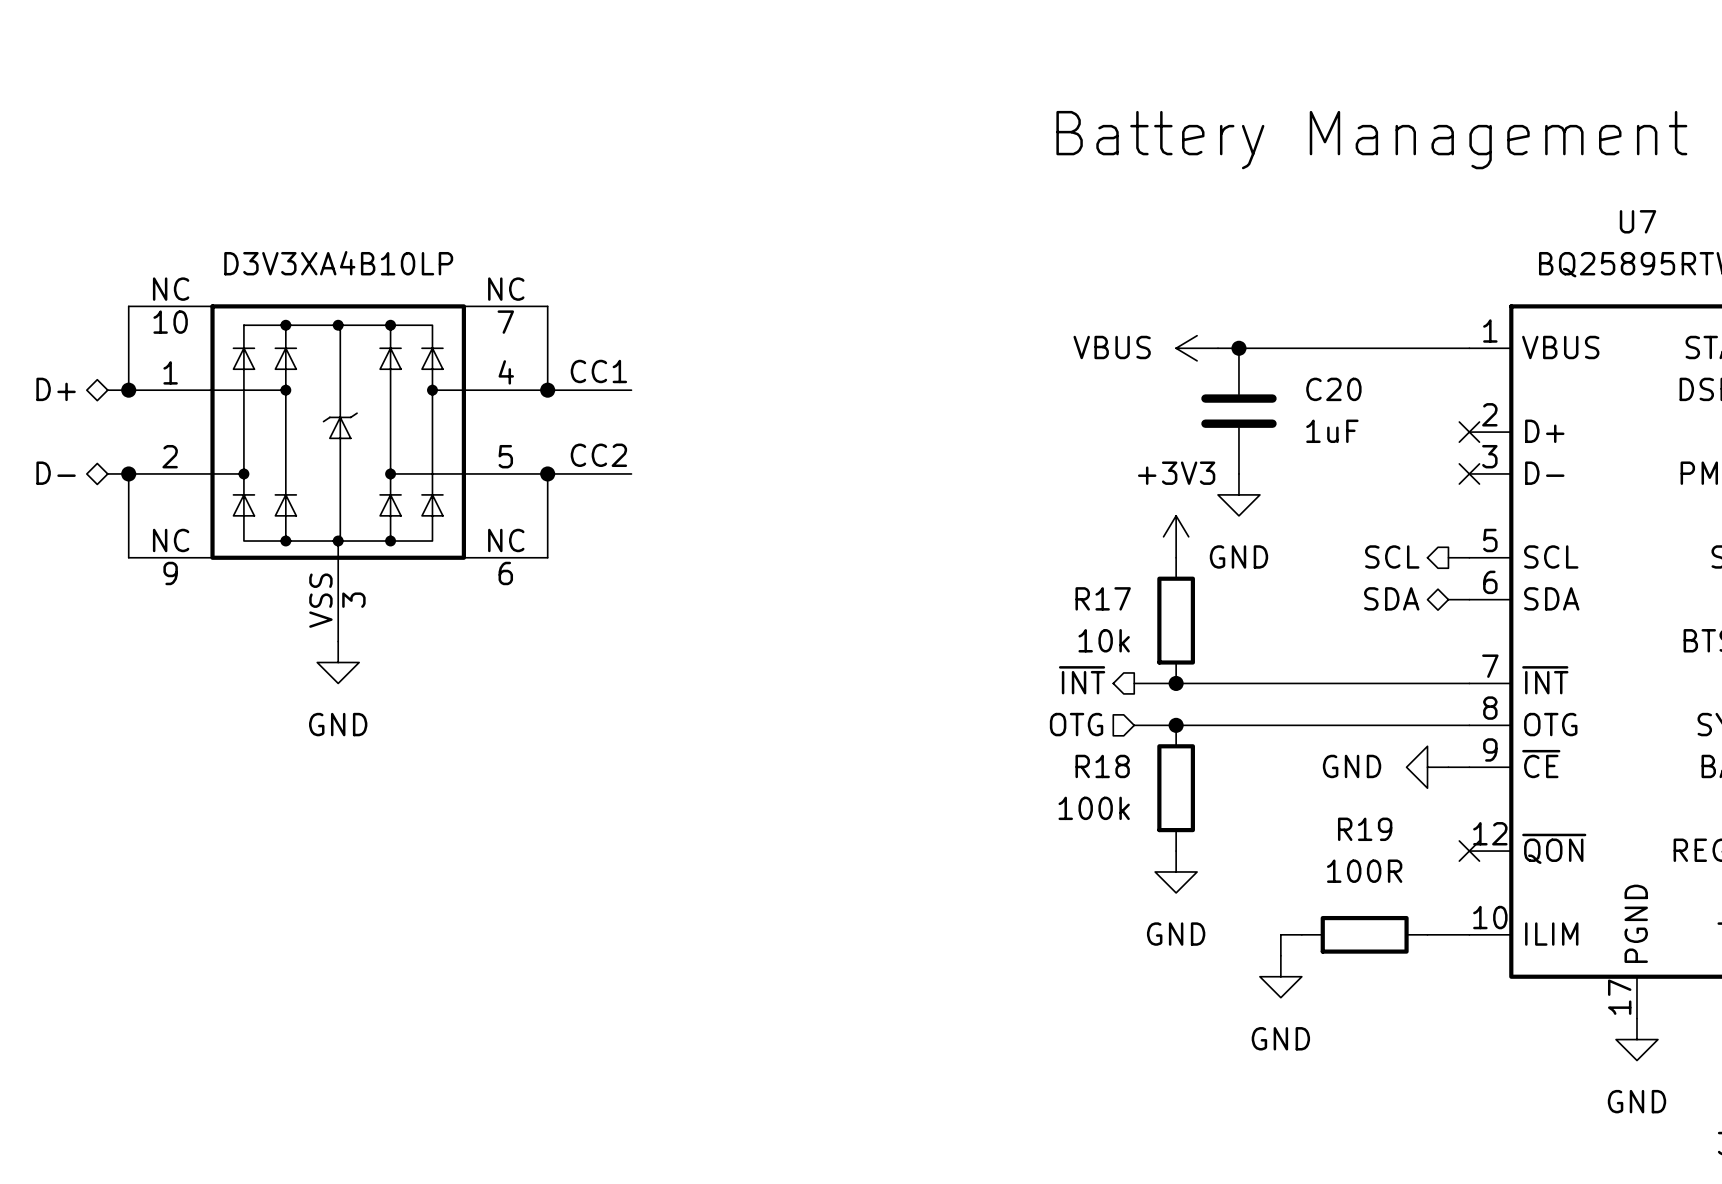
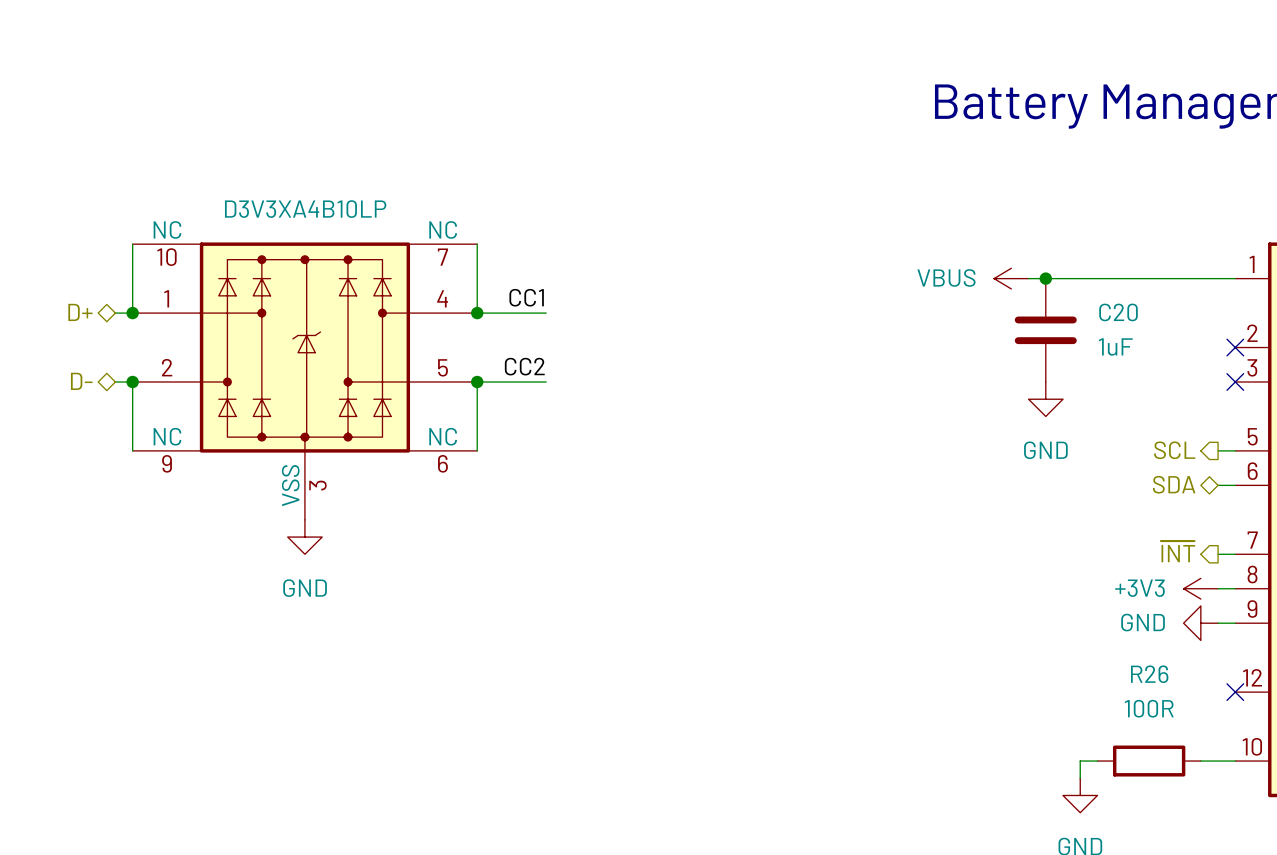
power symbol rotation: 0° (1176, 536) -> 90° counterclockwise (1200, 588)
power symbol position: +3V3 (1176, 536) -> +3V3 (1200, 588)
R17: 10k (1176, 620) -> none
hierarchical label position: ~{INT} (1082, 680) -> ~{INT} (1178, 551)
wire: (1134, 683) (1448, 683) -> none
junction: (1176, 683) -> none
hierarchical label: OTG (1076, 724) -> none
wire: (1134, 725) (1448, 725) -> none
junction: (1176, 725) -> none
R18: 100k (1176, 788) -> none
R19 name: R19 (1365, 829) -> R26 (1149, 674)
power symbol: GND (1176, 871) -> none

